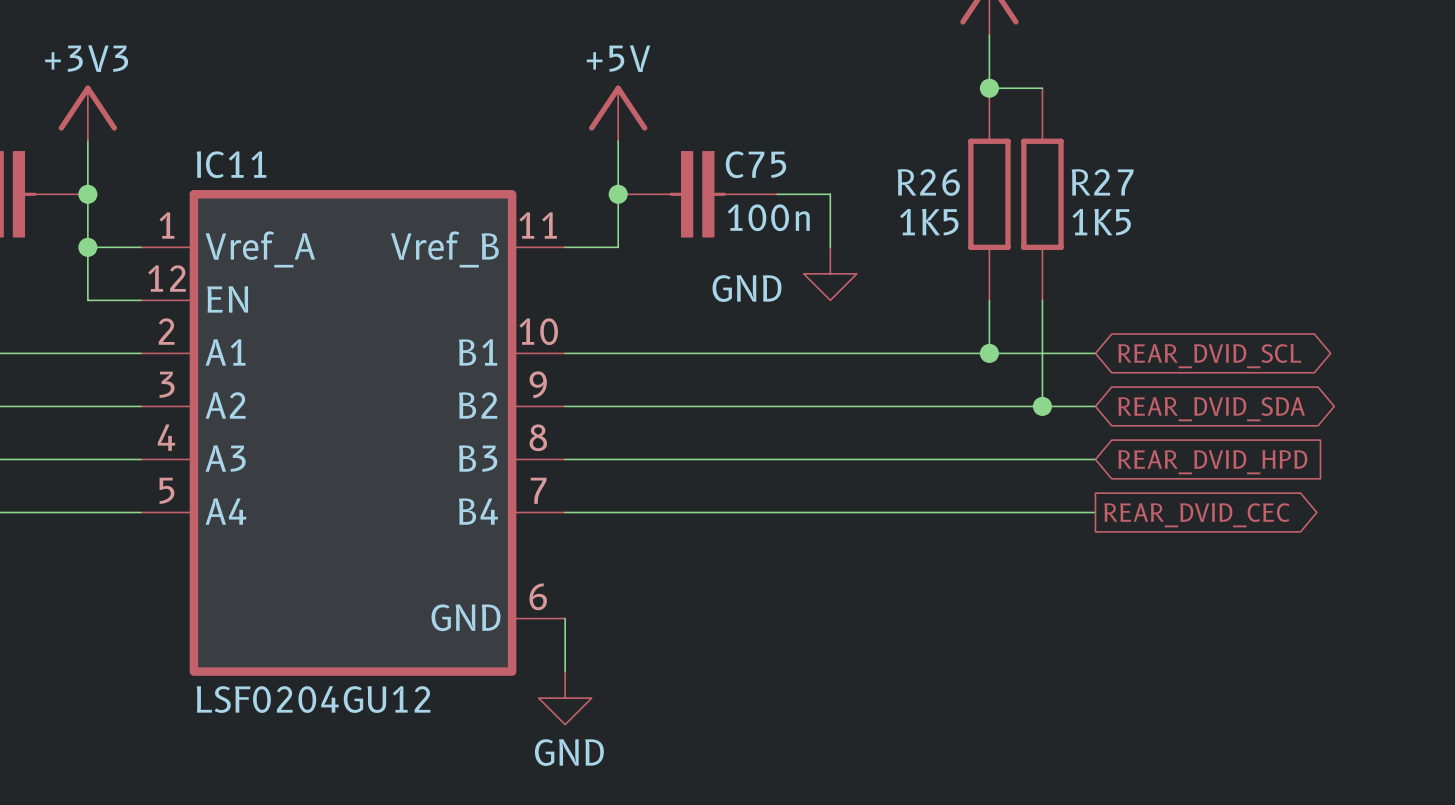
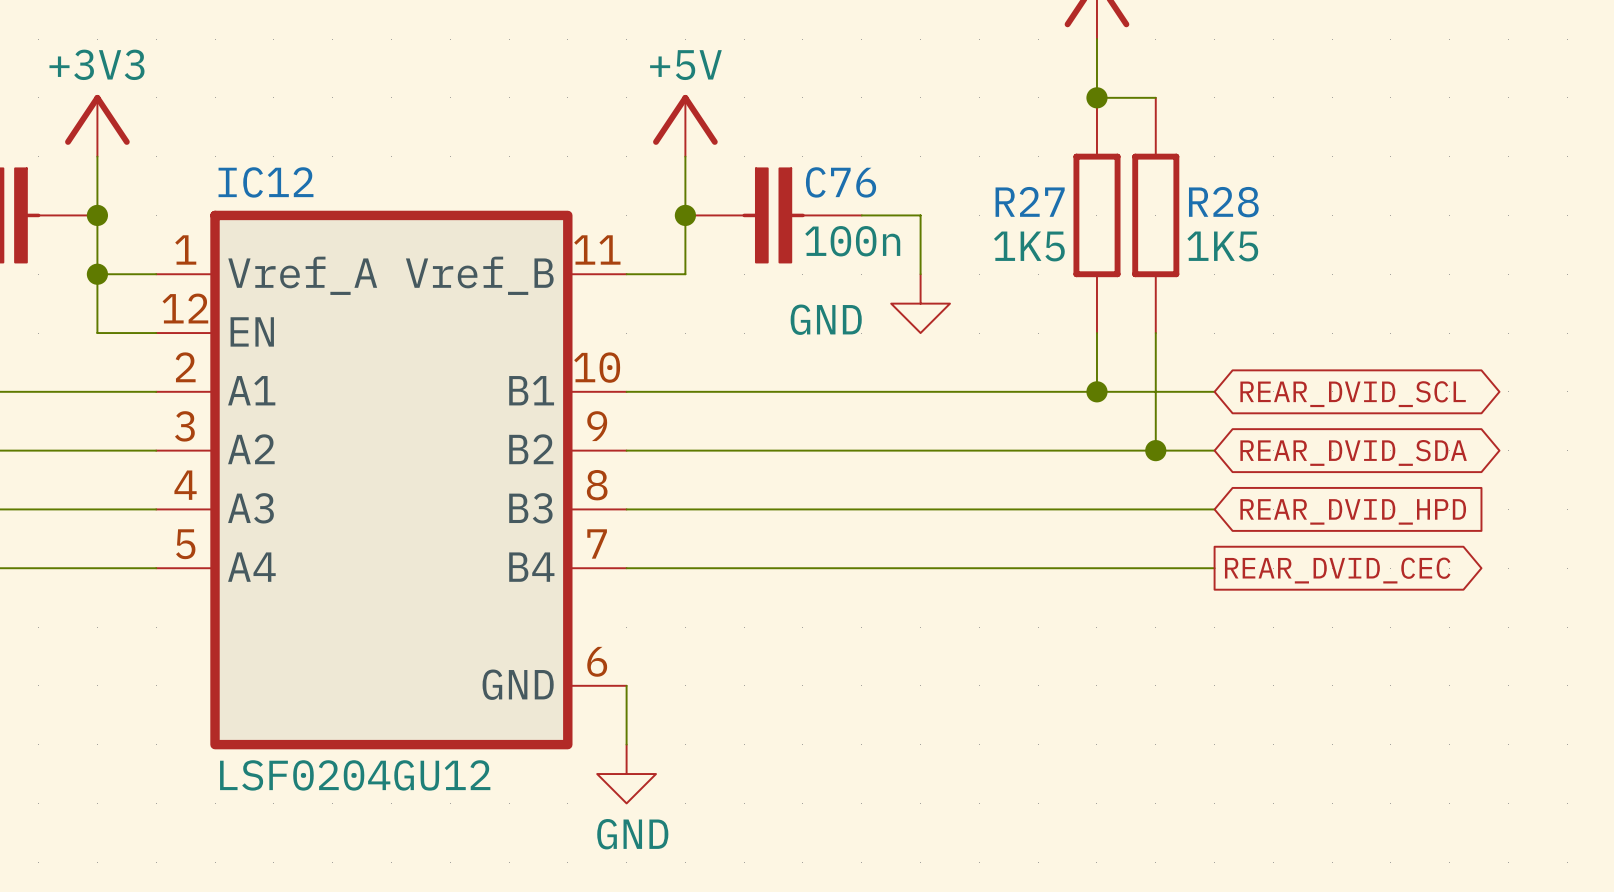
IC11 name: IC11 (231, 164) -> IC12 (266, 182)
C75 name: C75 (755, 164) -> C76 (841, 182)
R26 name: R26 (928, 182) -> R27 (1030, 201)
R27 name: R27 (1102, 182) -> R28 (1223, 202)

